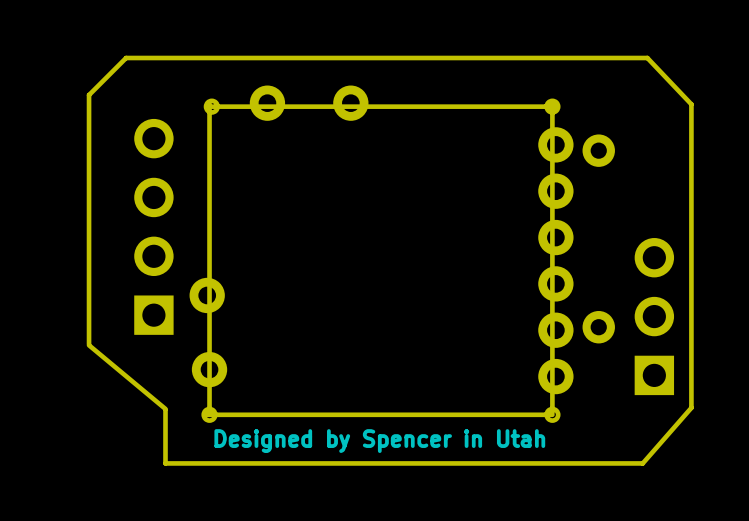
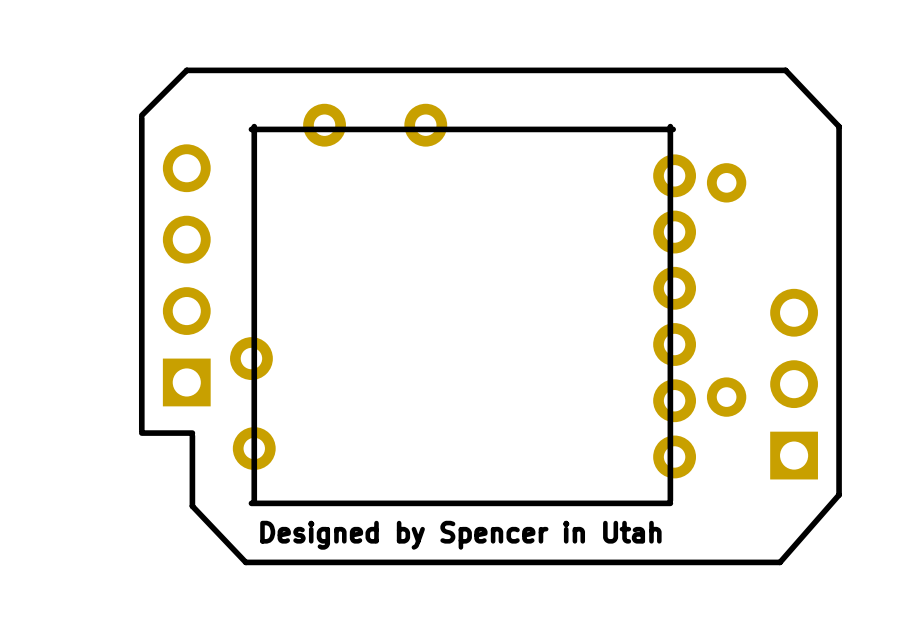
board edge: (153, 57) (126, 57) (89, 95) (89, 344) -> (186, 70) (141, 115)
board edge: none -> (141, 118) (141, 430)
round board edge: [203, 98, 220, 115] -> none
round board edge: [544, 98, 561, 115] -> none
board edge: (89, 345) (165, 409) -> none
board edge: none -> (192, 433) (141, 433)
round board edge: [201, 406, 218, 423] -> none
round board edge: [544, 406, 561, 423] -> none
board edge: (165, 410) (165, 463) (202, 463) -> (192, 435) (192, 506) (245, 562)

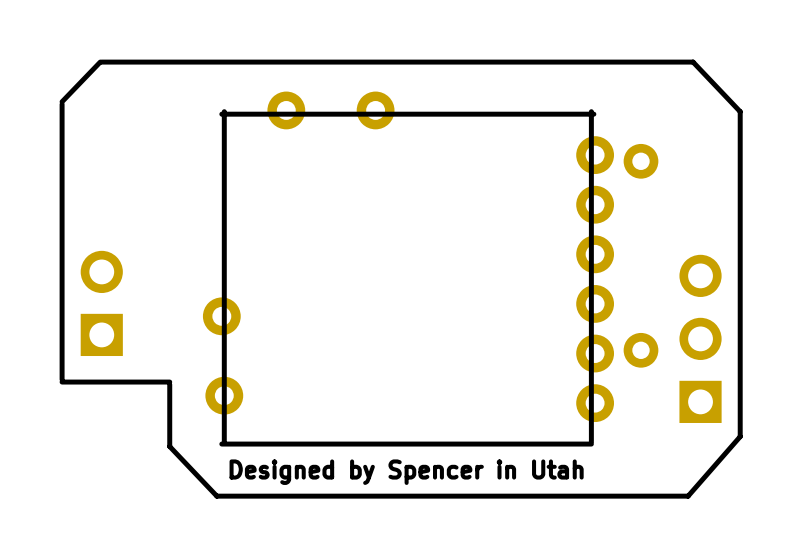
board edge: none -> (100, 62) (62, 101)
board edge: (186, 70) (141, 115) -> (164, 62) (101, 62)
board edge: (141, 118) (141, 430) -> (62, 104) (62, 379)
part: (186, 275) -> none
part: none -> (101, 303)
board edge: none -> (125, 382) (62, 382)

